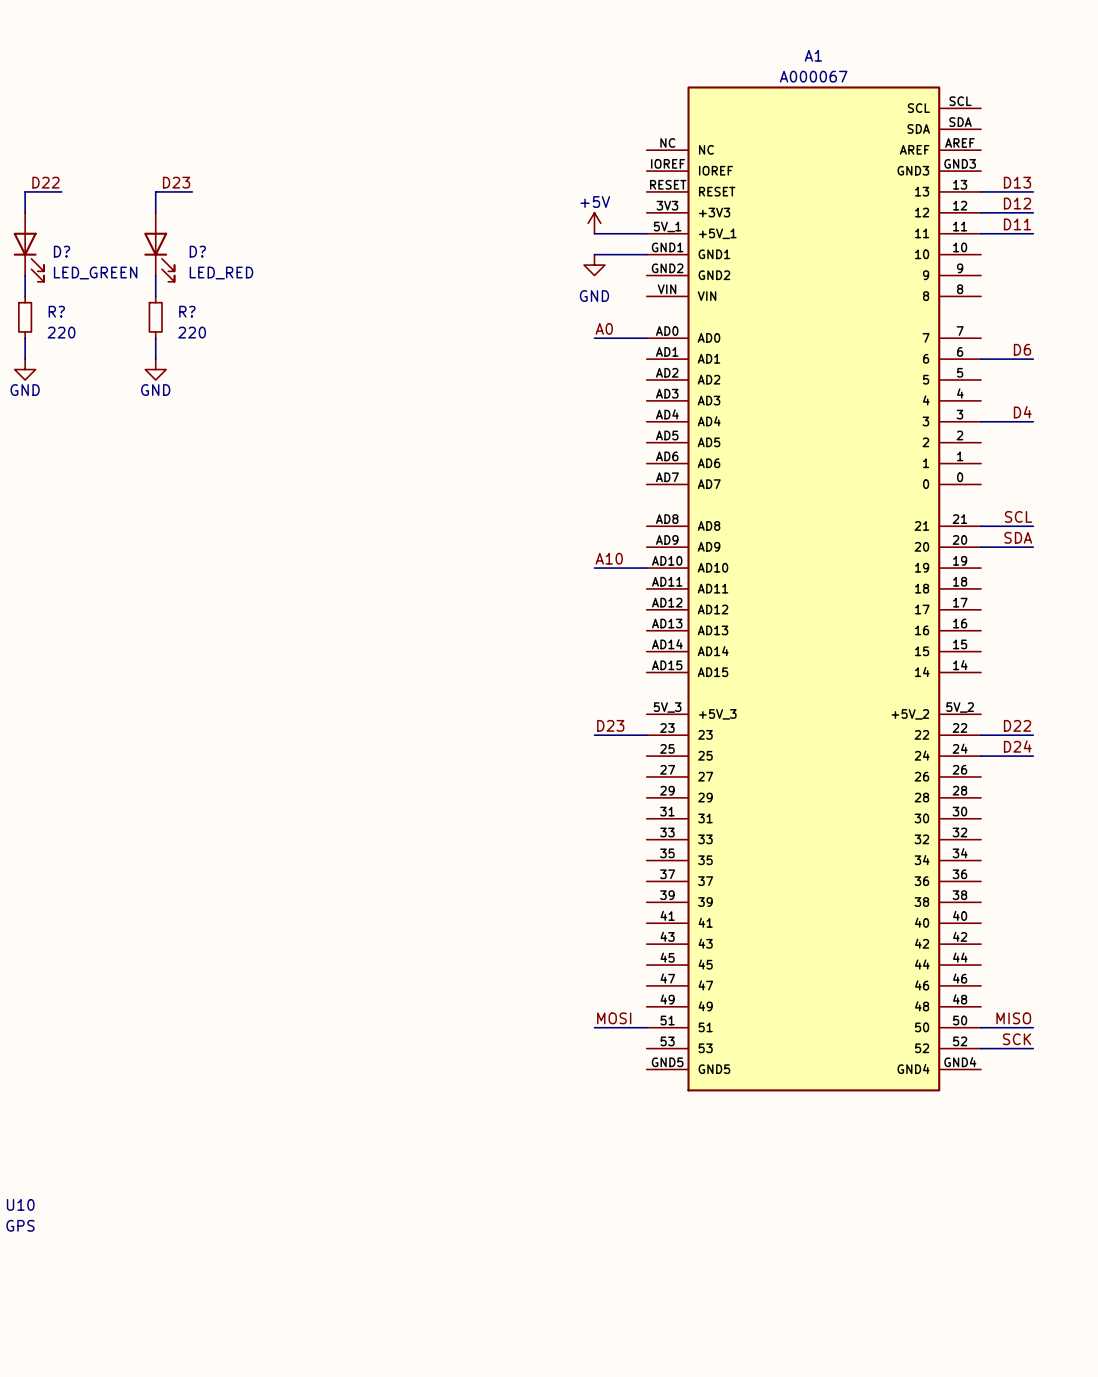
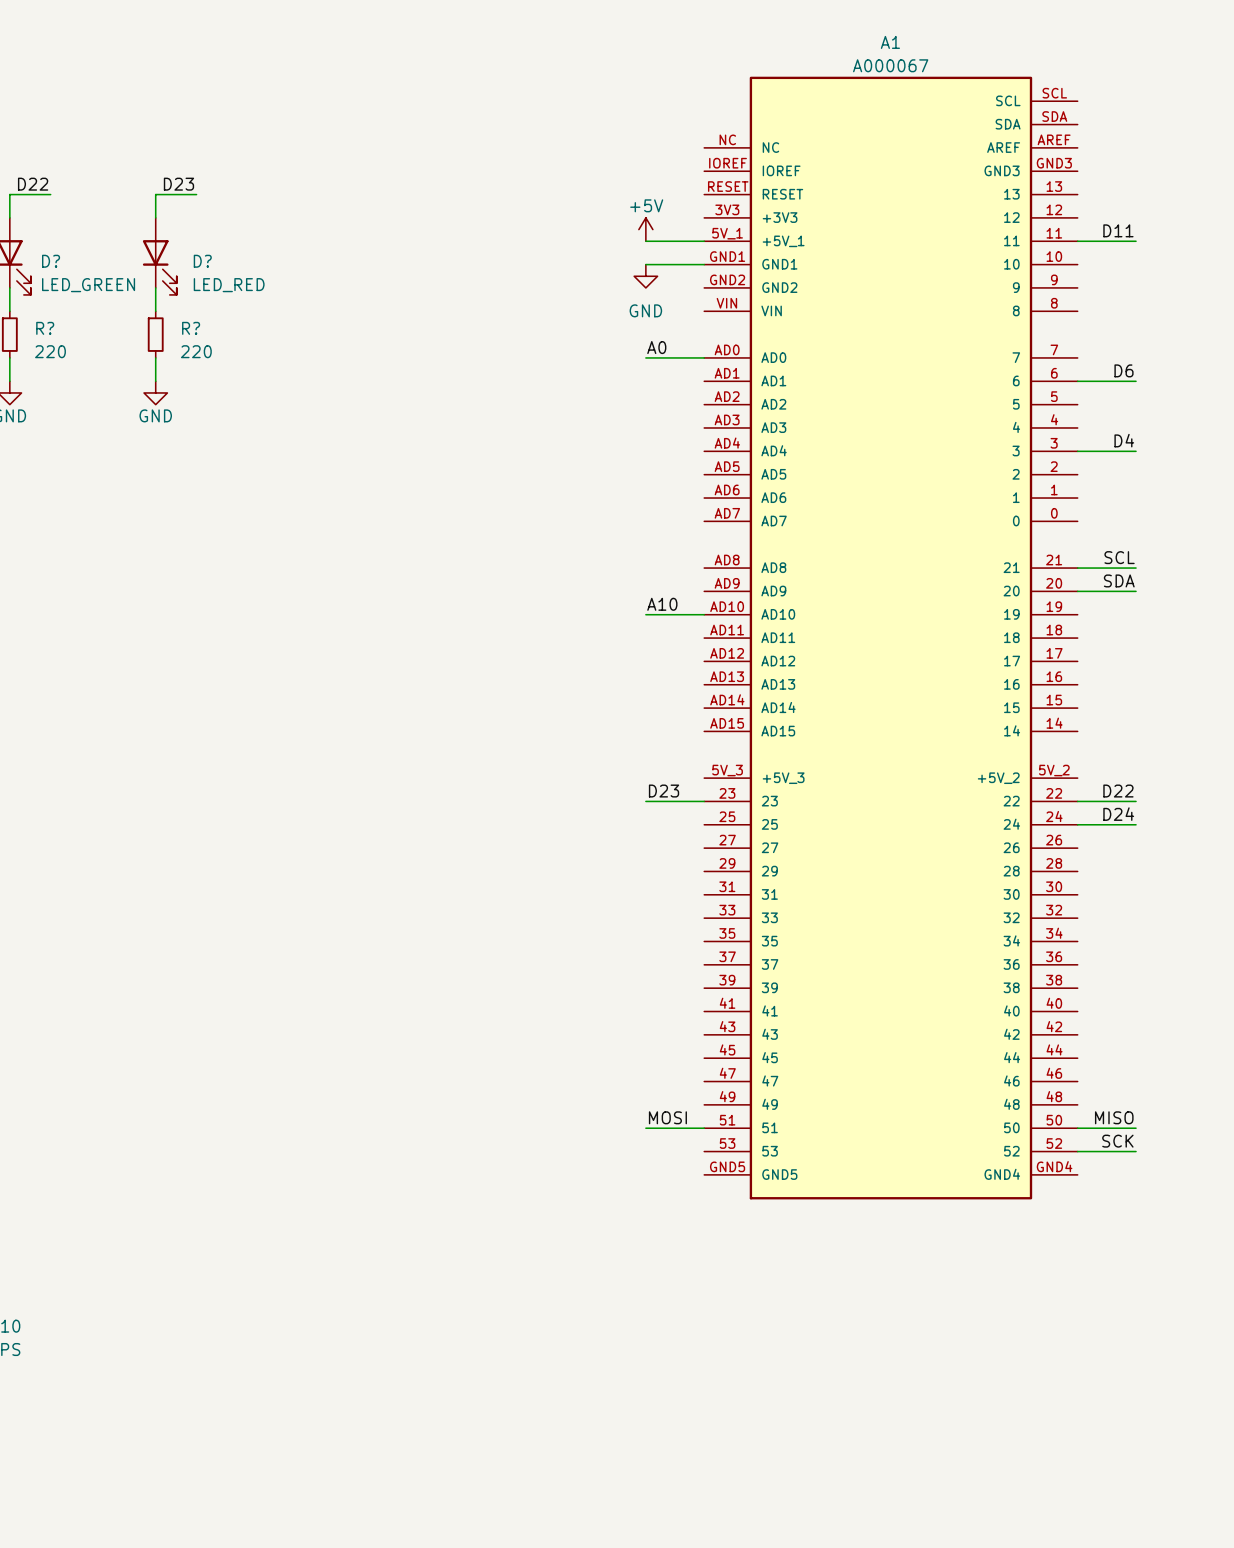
label: D13 (1017, 182) -> none
wire: (981, 191) (1033, 191) -> none
label: D12 (1017, 203) -> none
wire: (981, 212) (1033, 212) -> none

